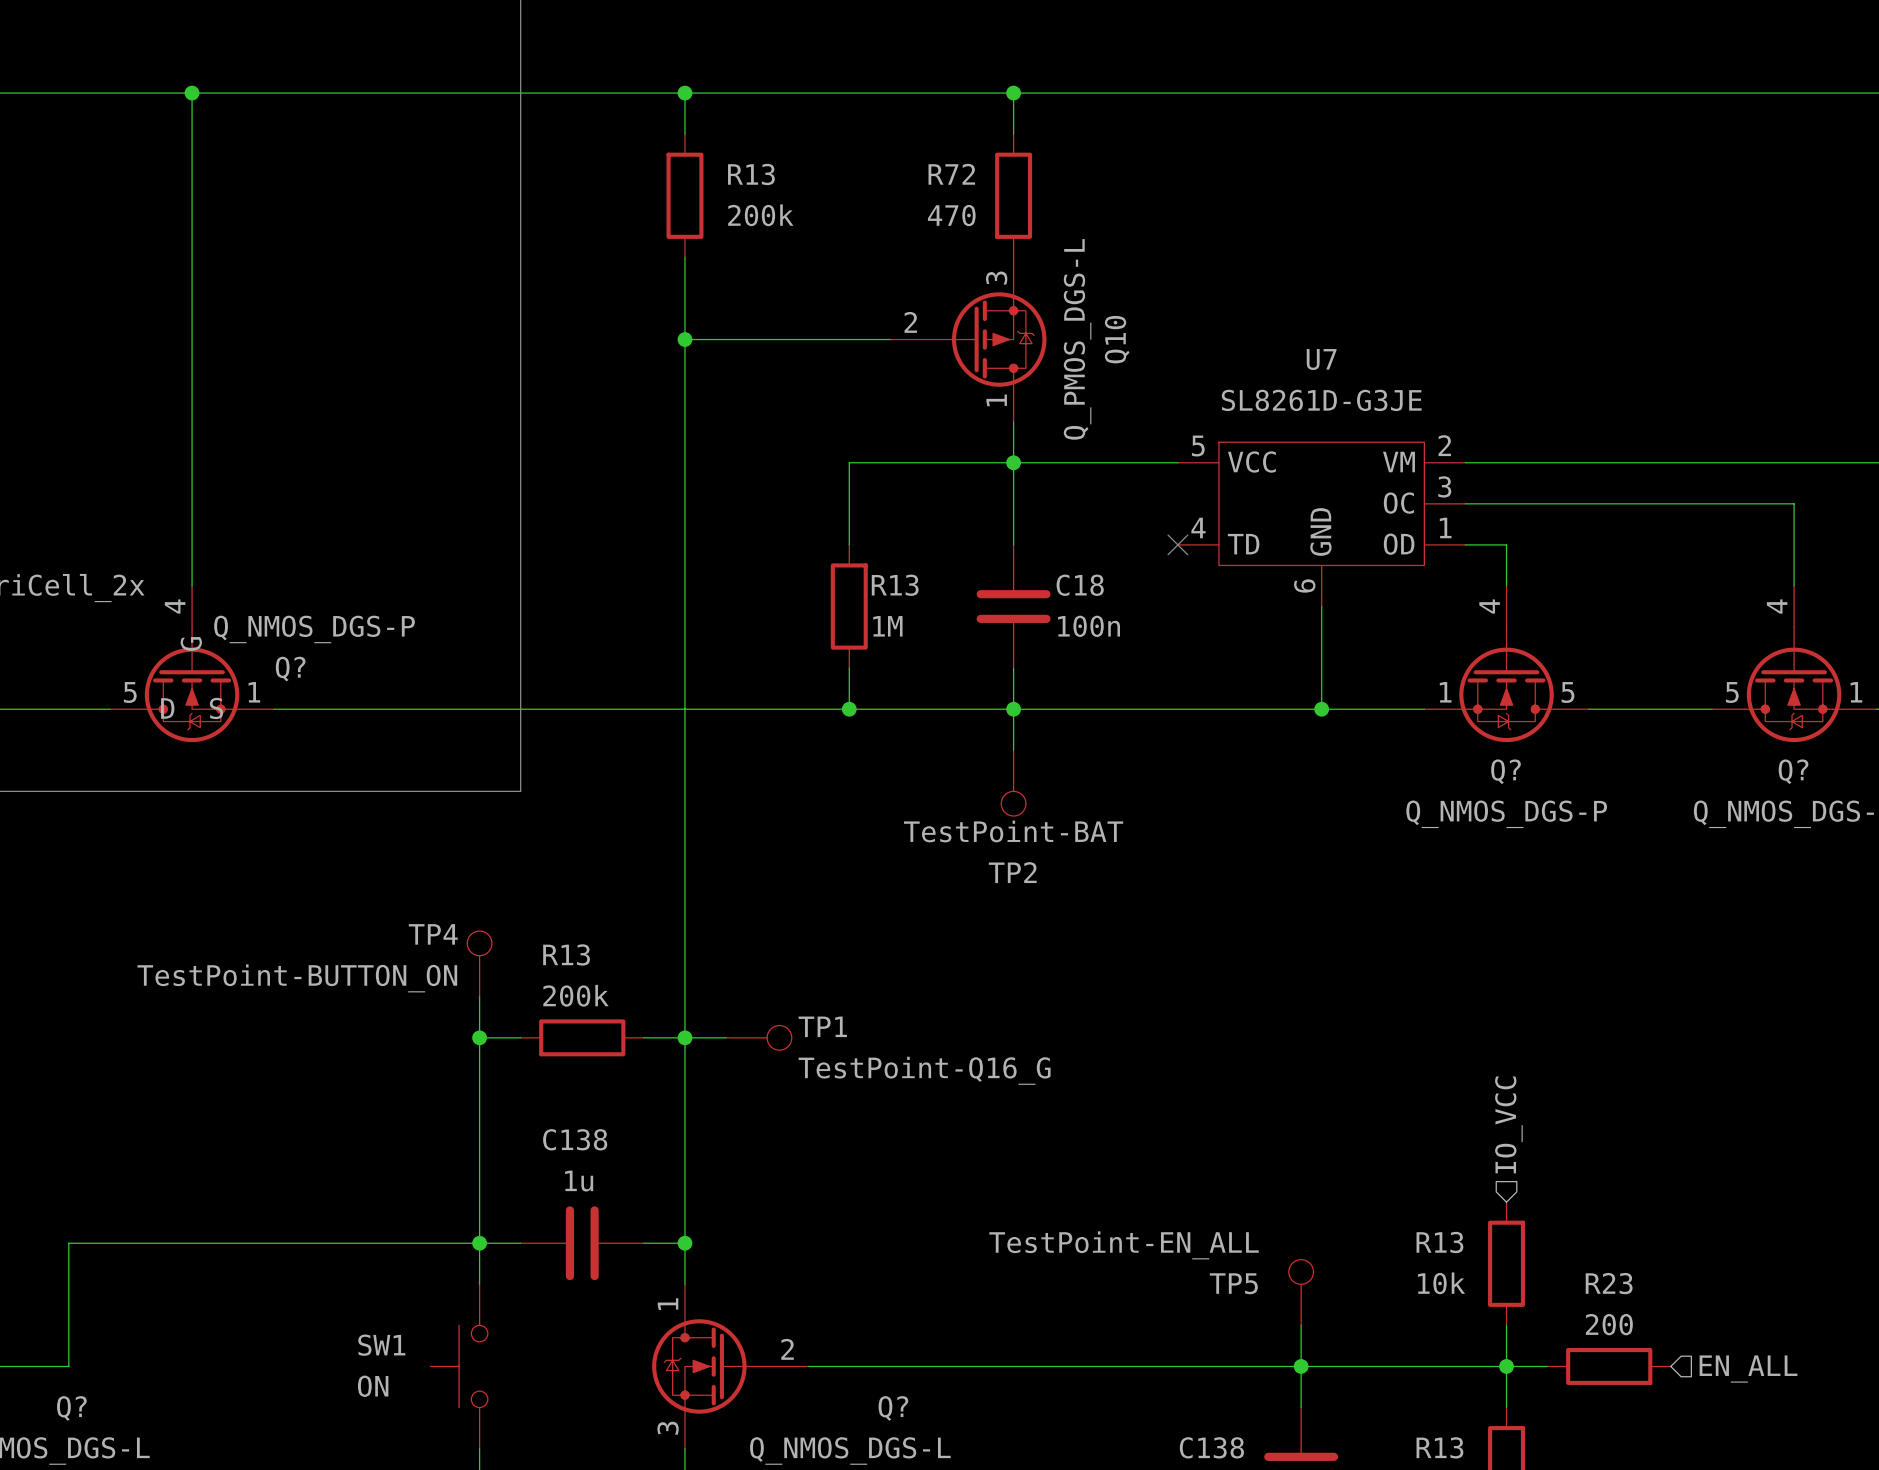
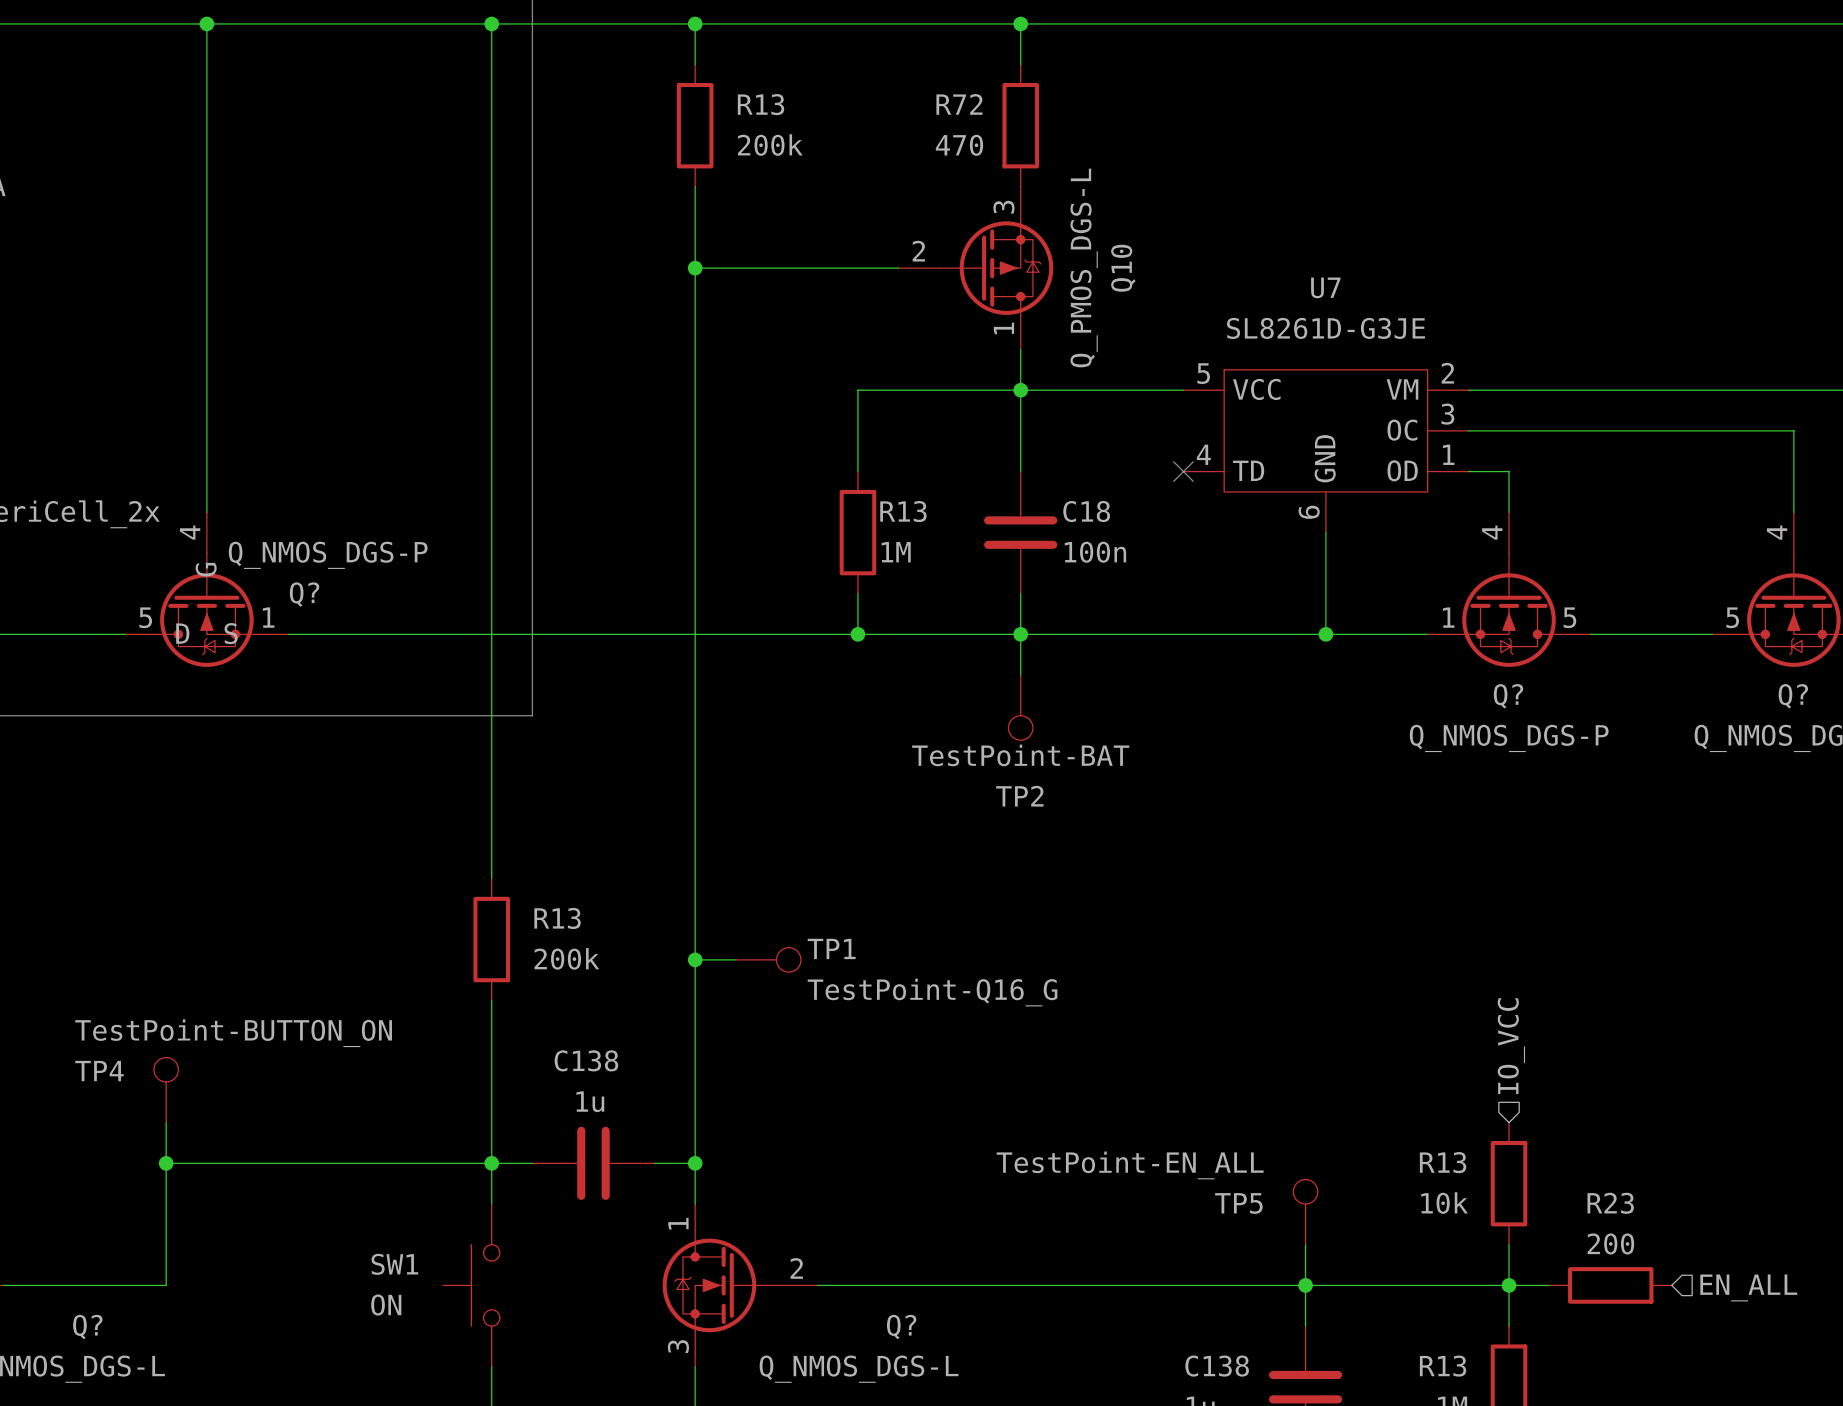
wire: none -> (491, 23) (491, 878)
junction: none -> (491, 23)
TP4 name position: TP4 (433, 934) -> TP4 (99, 1071)
TP4 position: (479, 963) -> (166, 1090)
TP4 value position: TestPoint-BUTTON_ON (297, 978) -> TestPoint-BUTTON_ON (233, 1033)
R13 value position: 200k (575, 995) -> 200k (566, 958)
wire: (479, 996) (479, 1078) -> none
wire: (479, 1037) (520, 1037) -> none
junction: (479, 1037) -> none
R13 rotation: 0° (582, 1037) -> 90° clockwise (491, 939)
R13 position: (582, 1037) -> (491, 939)
wire: (643, 1037) (684, 1037) -> none
wire: (150, 1243) (68, 1243) (68, 1366) -> (166, 1122) (166, 1285) (84, 1285)
junction: none -> (166, 1163)

